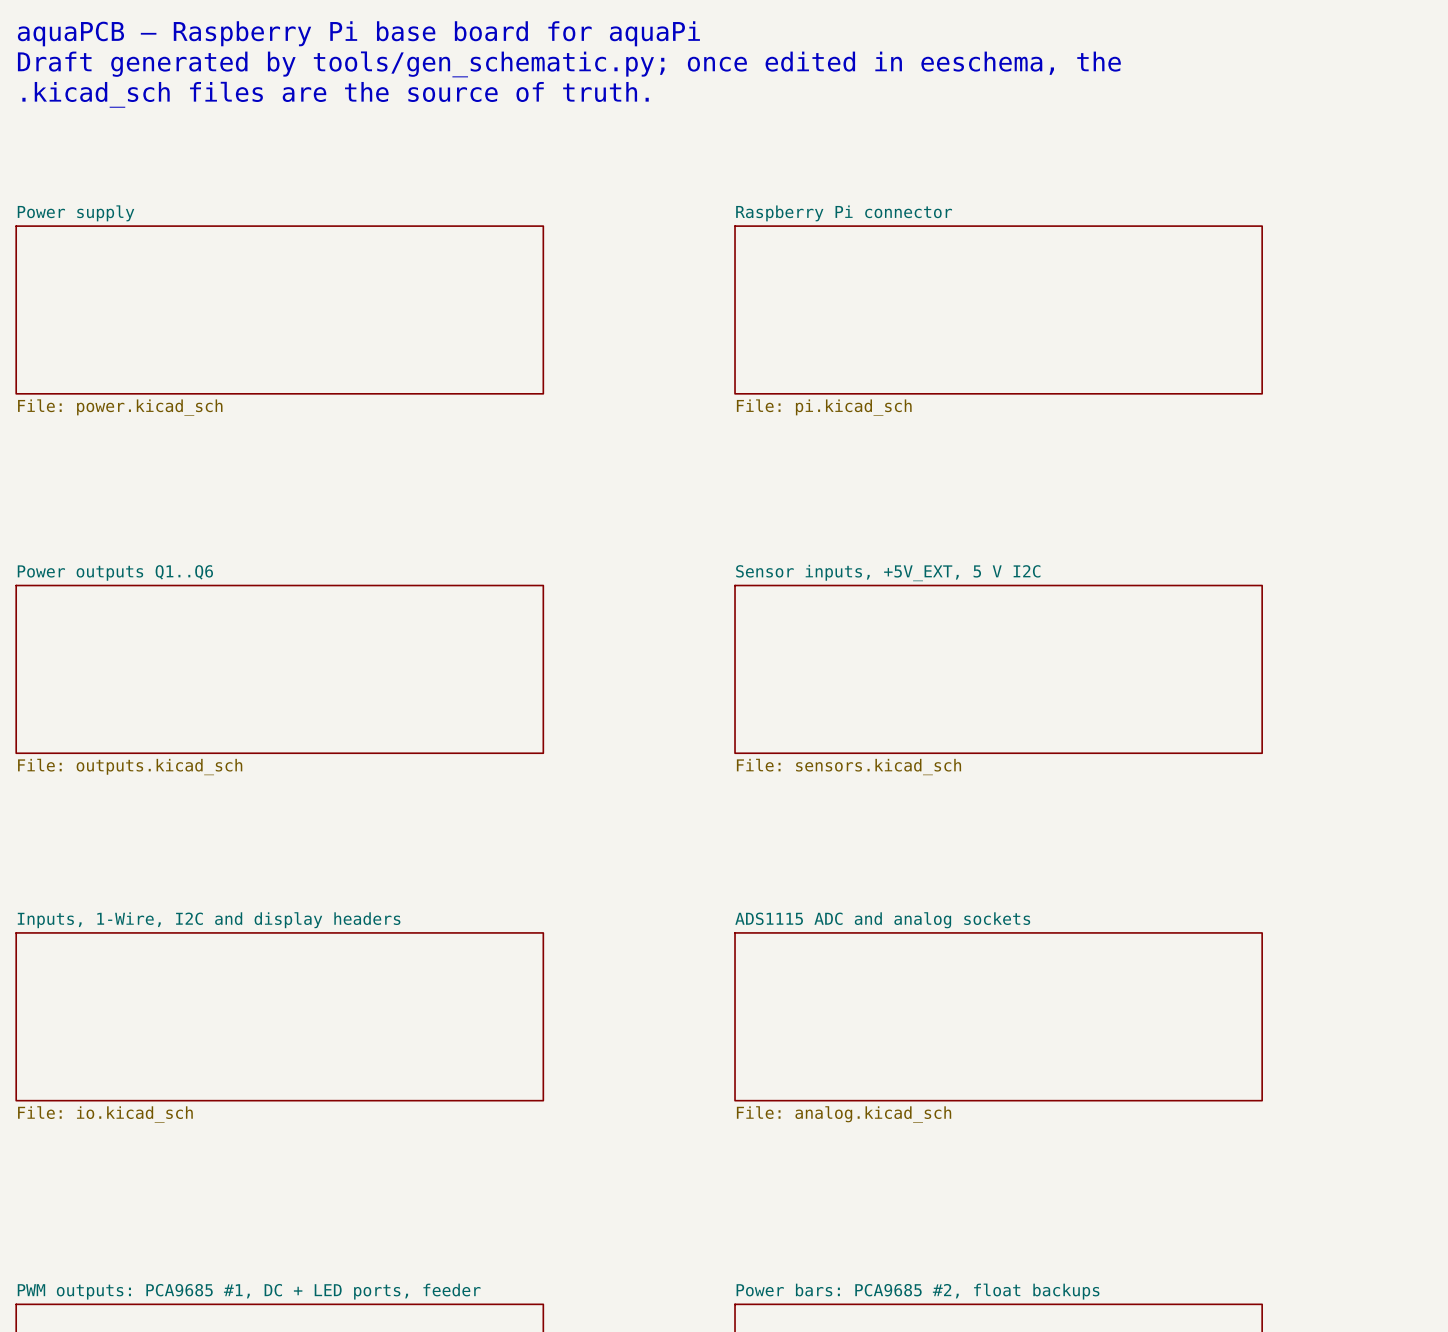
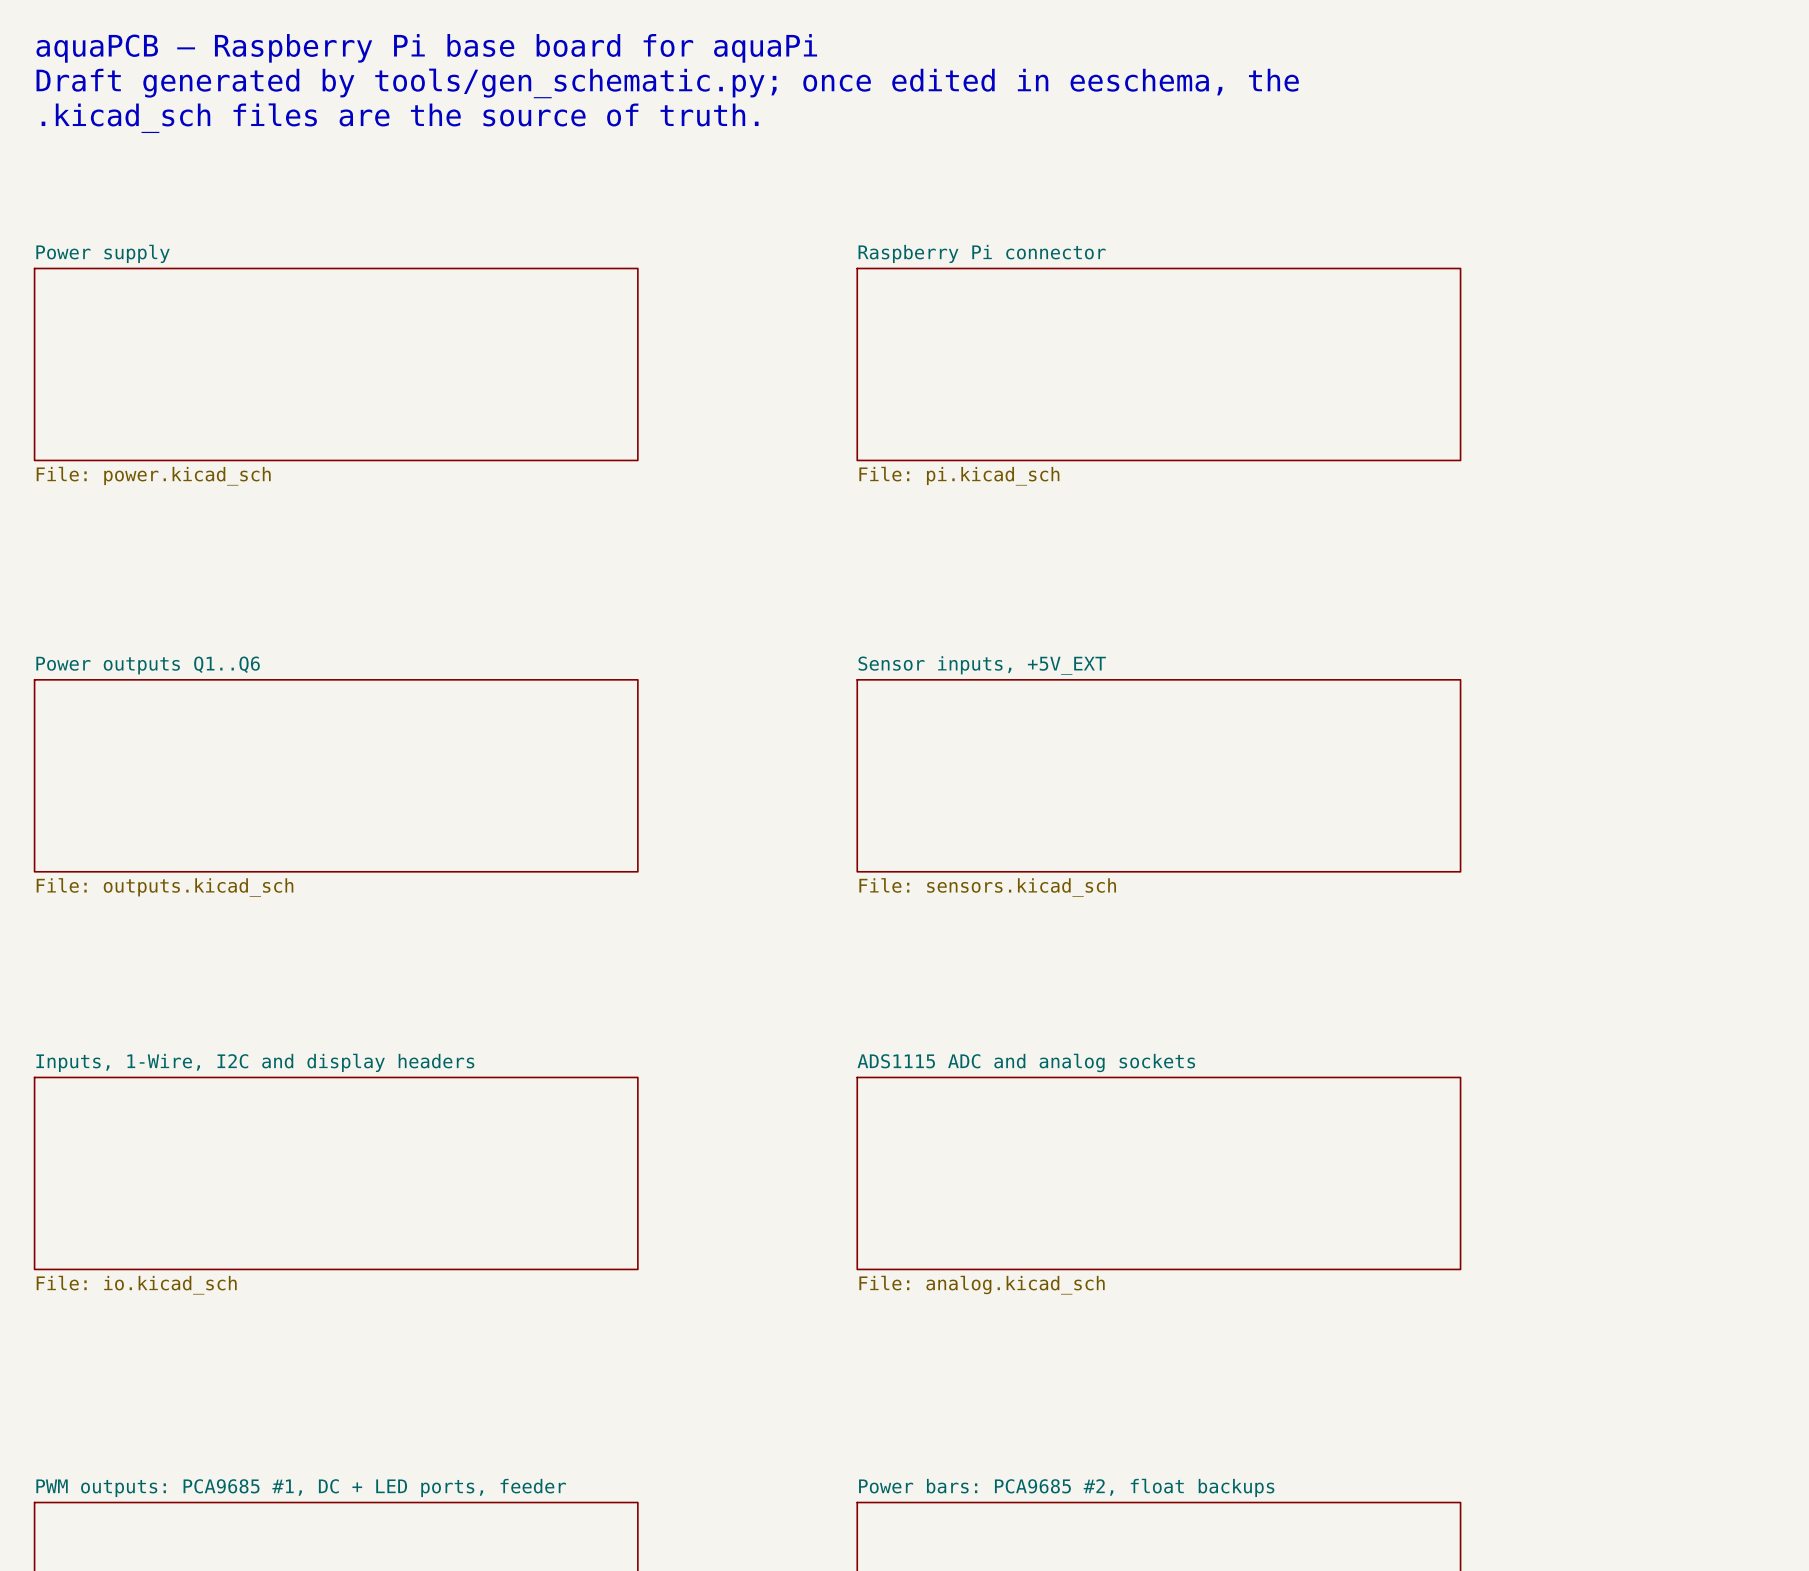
sheet Sensor inputs, +5V_EXT name: Sensor inputs, +5V_EXT, 5 V I2C (888, 573) -> Sensor inputs, +5V_EXT (982, 665)

